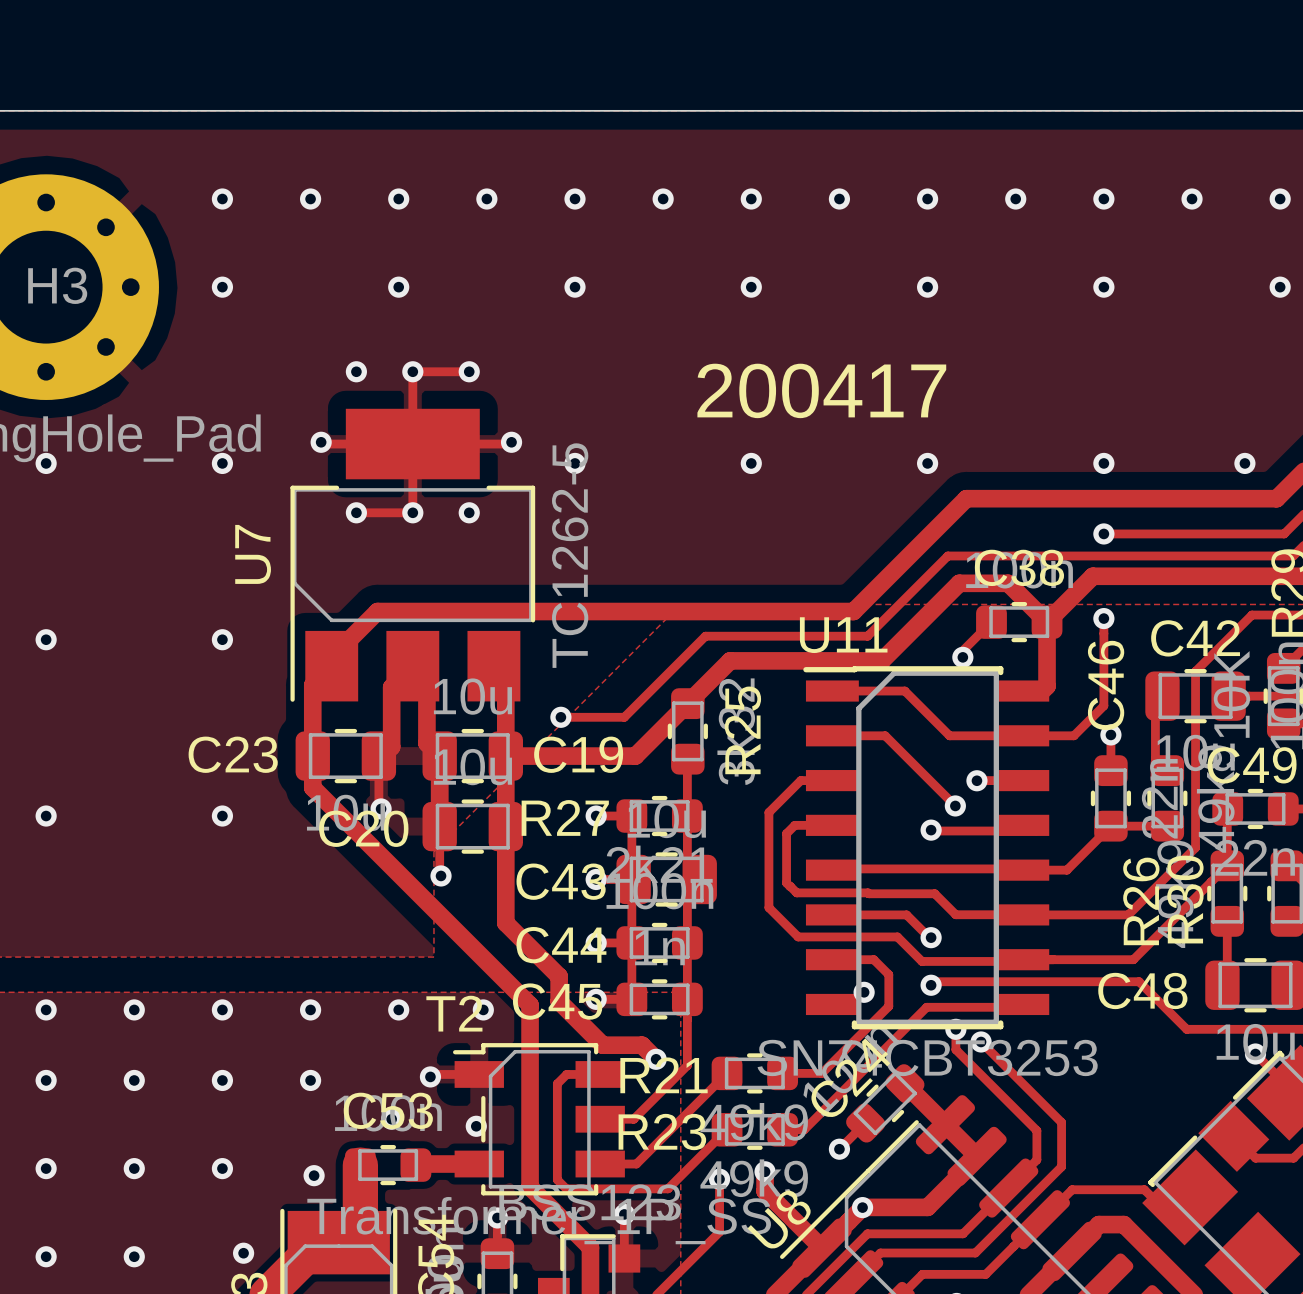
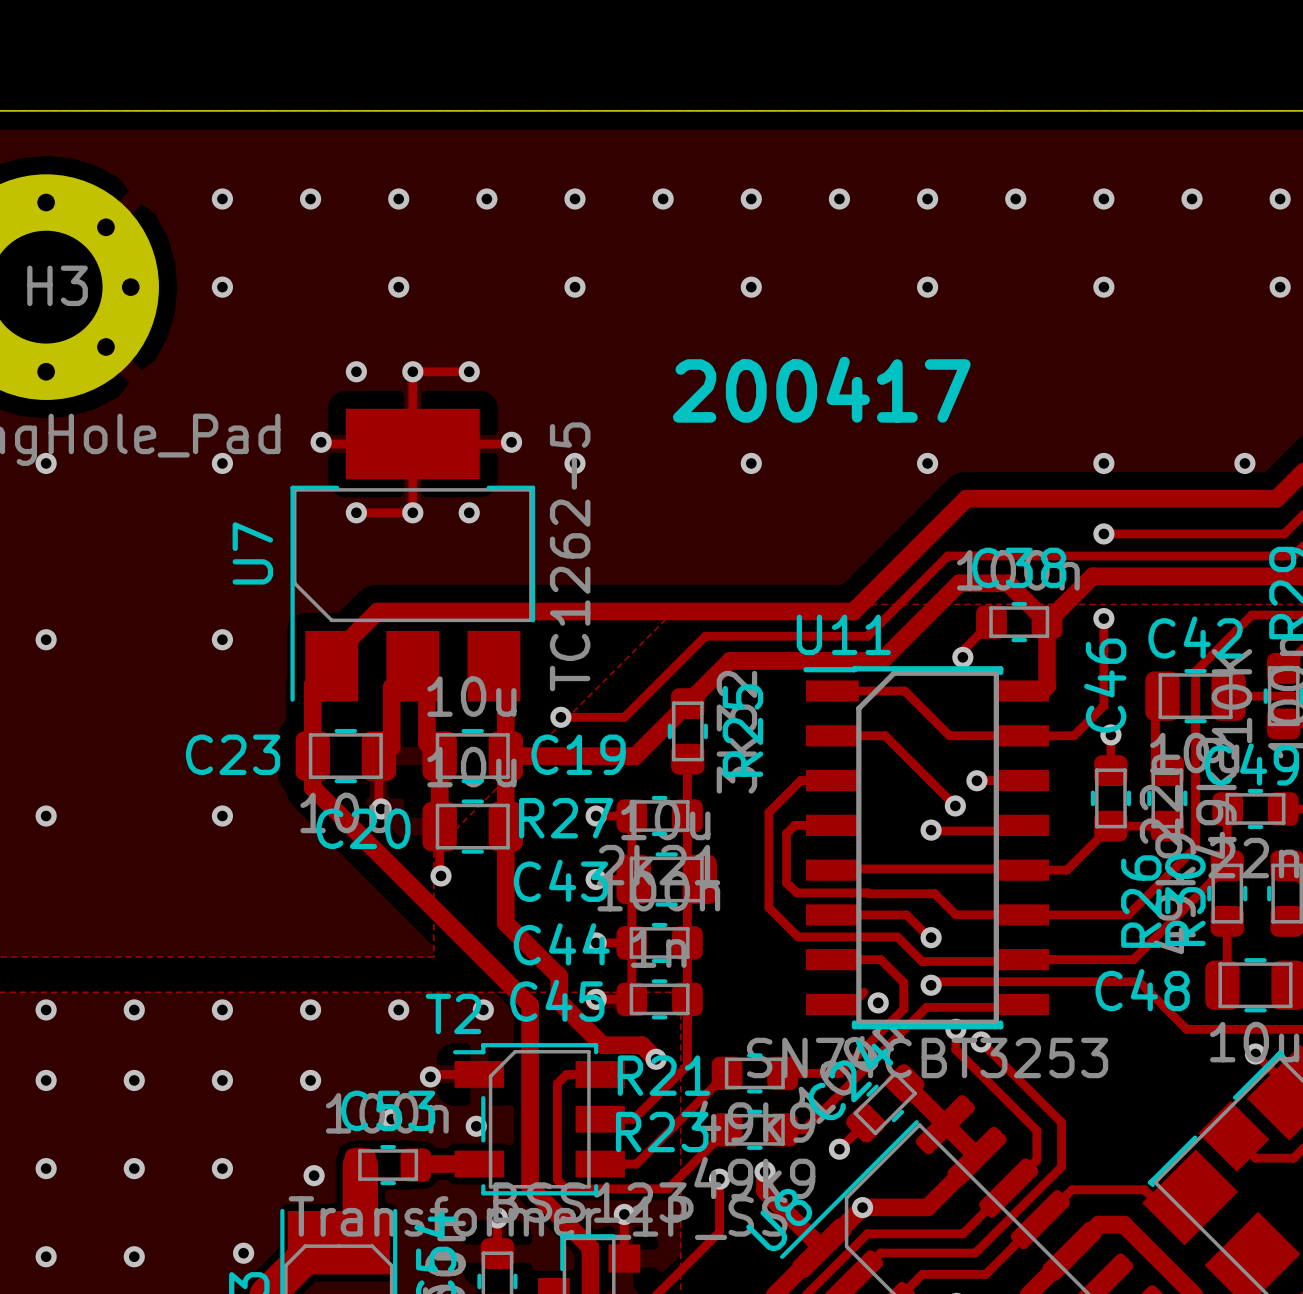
track: (873, 959) (888, 974) (888, 1006) (821, 1073) -> (873, 959) (880, 959) (903, 982) (903, 1009) (839, 1073) (821, 1073)
via position: (864, 992) -> (878, 1002)

